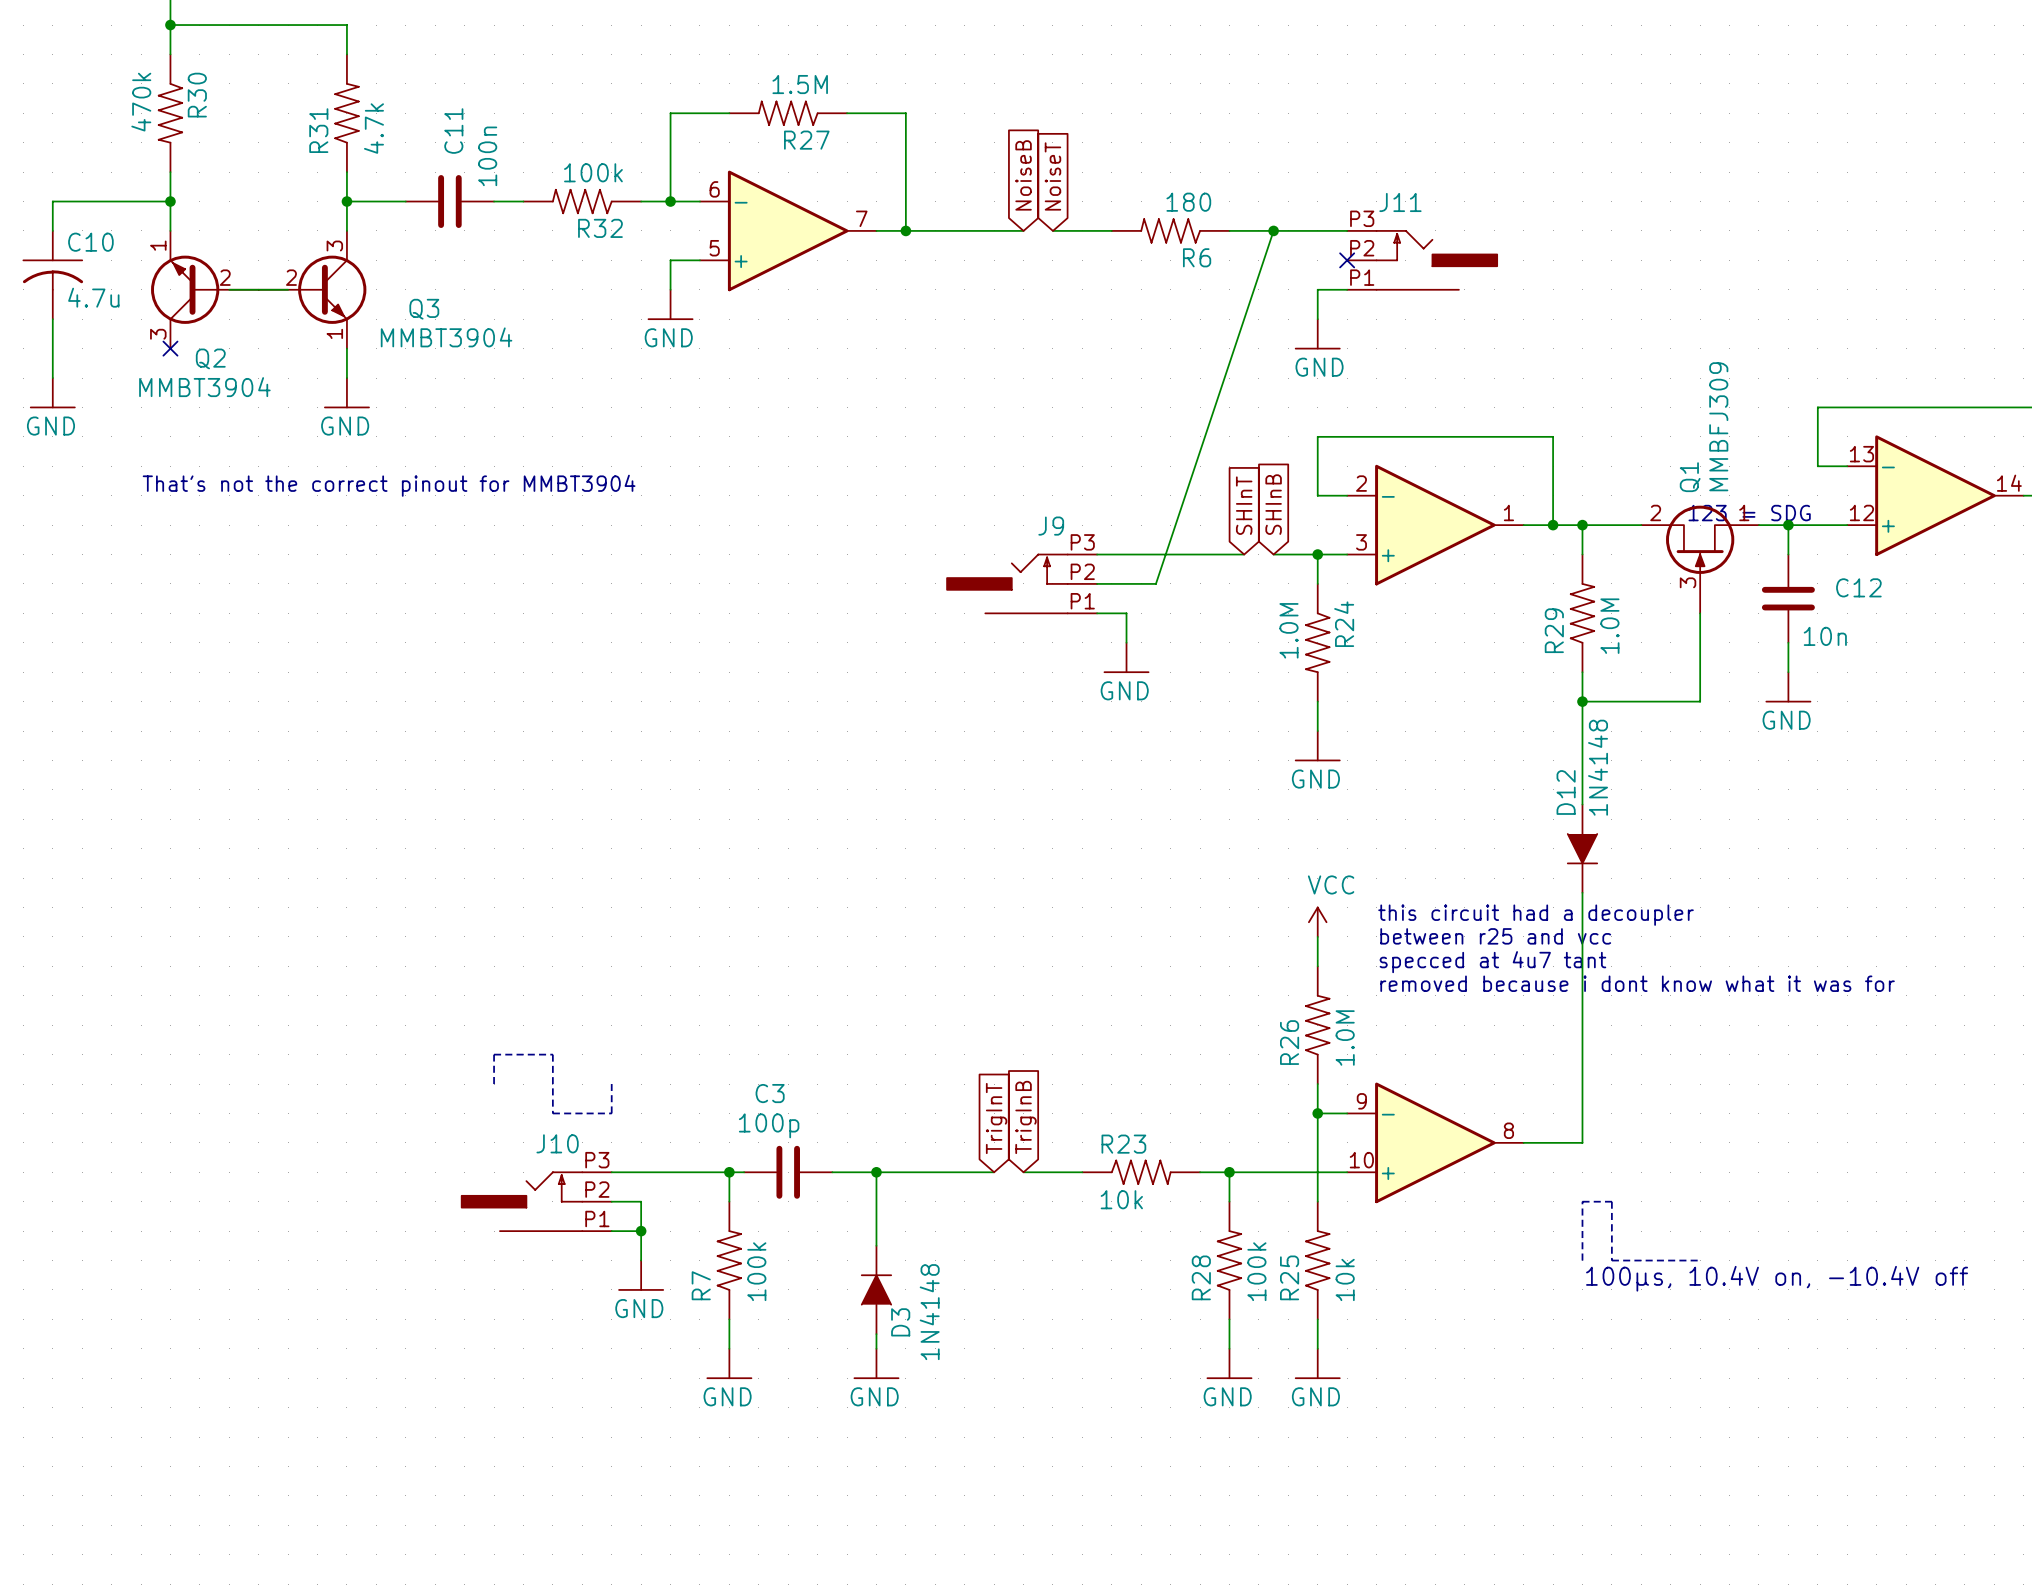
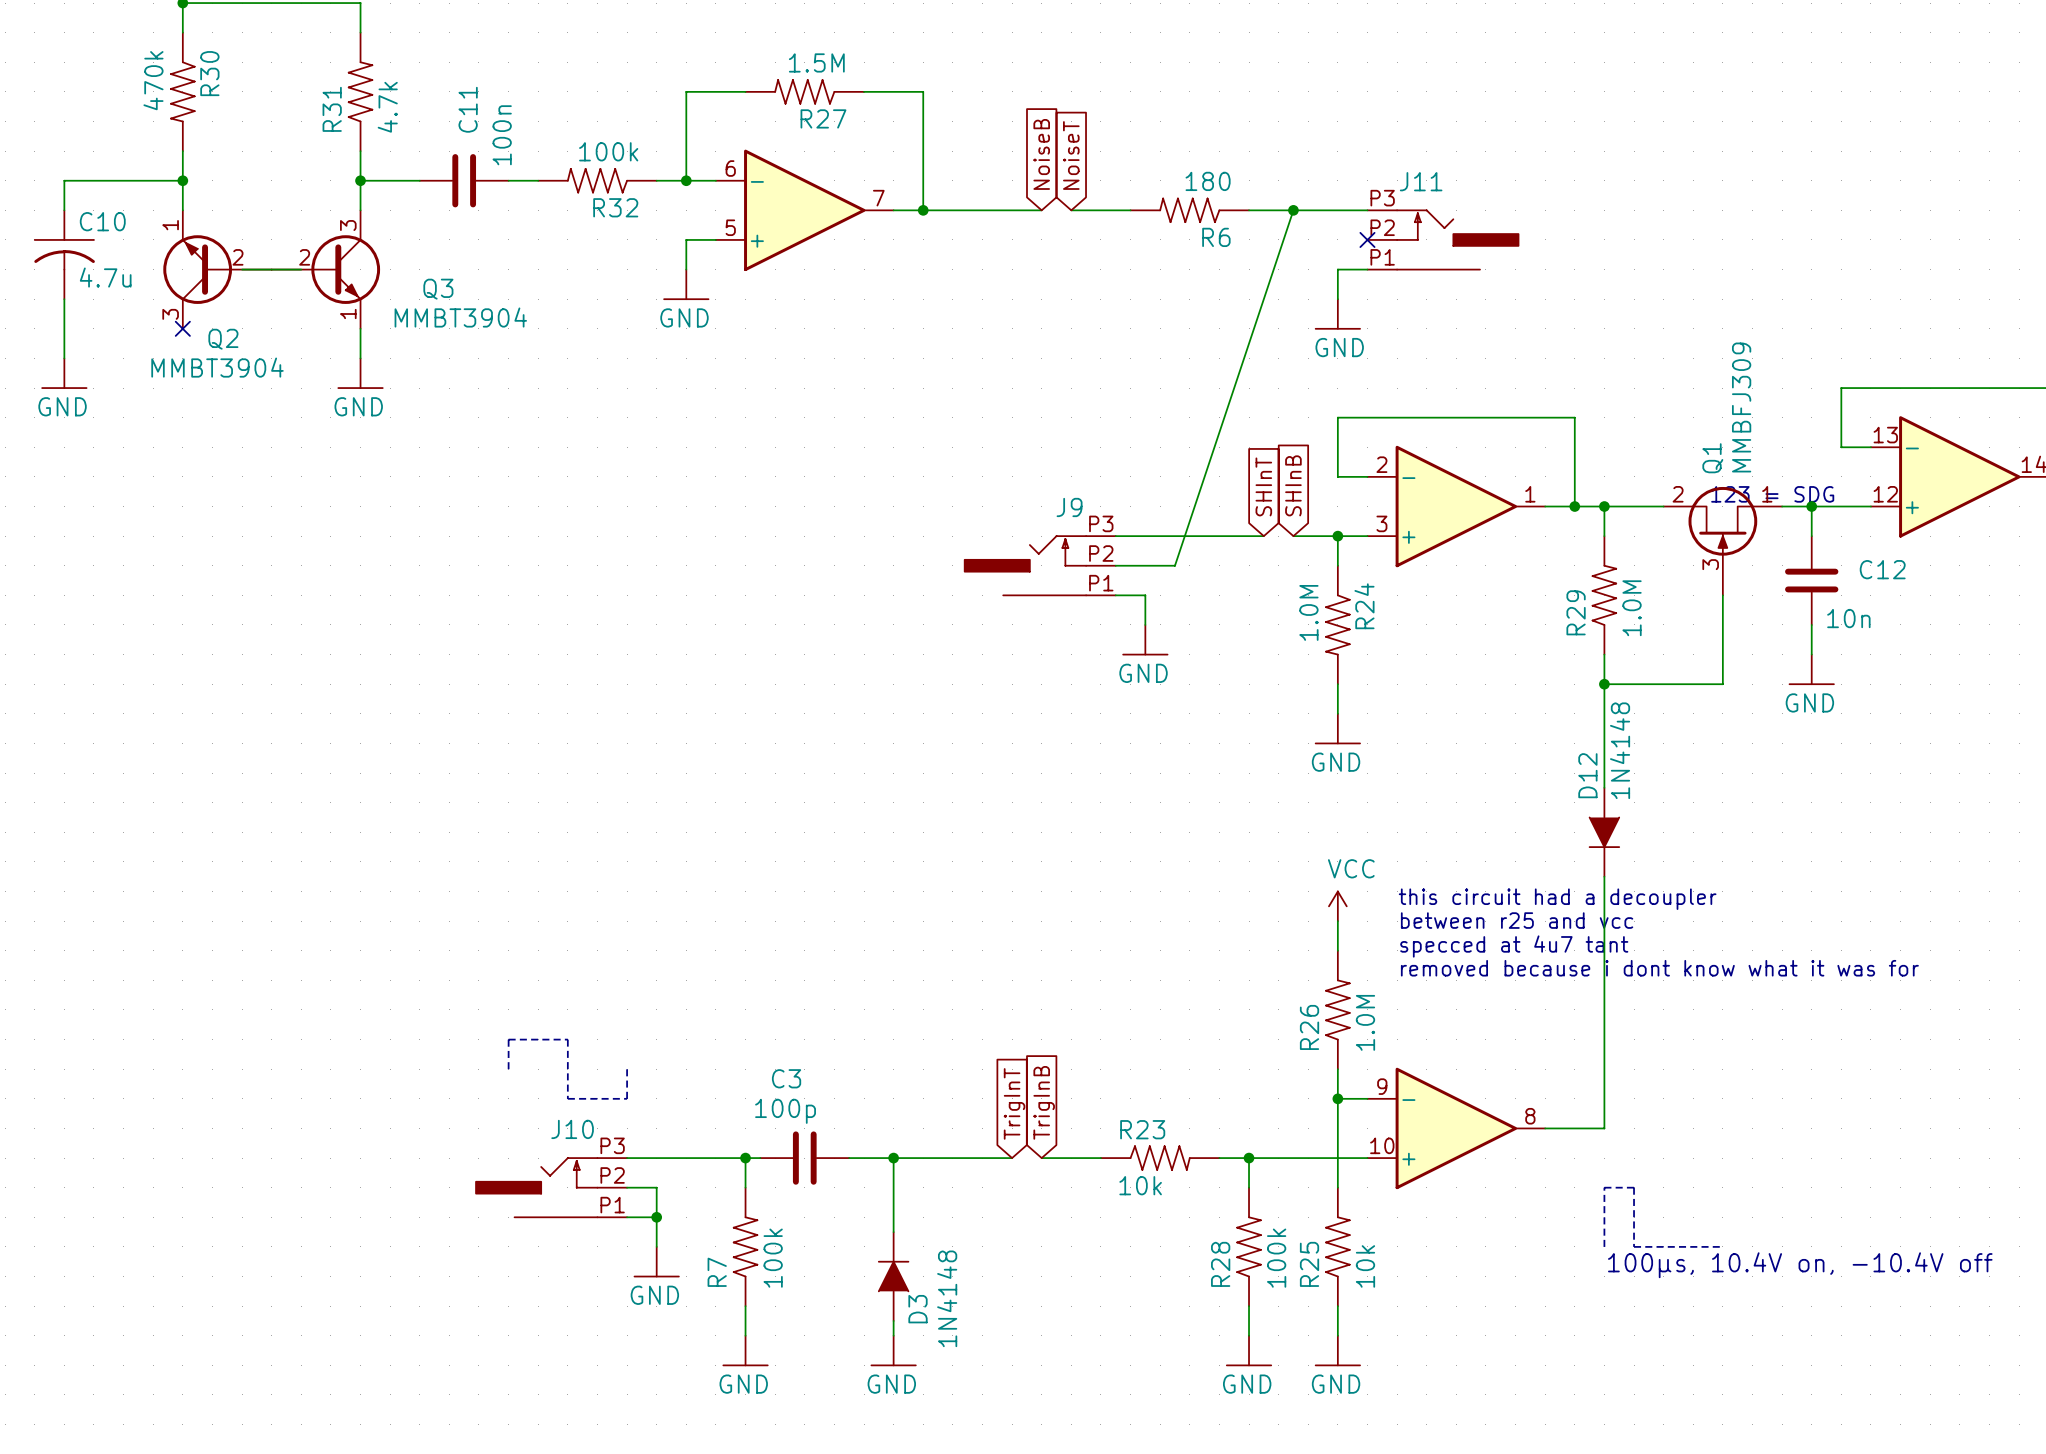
text: That's not the correct pinout for MMBT3904 (389, 485) -> none

